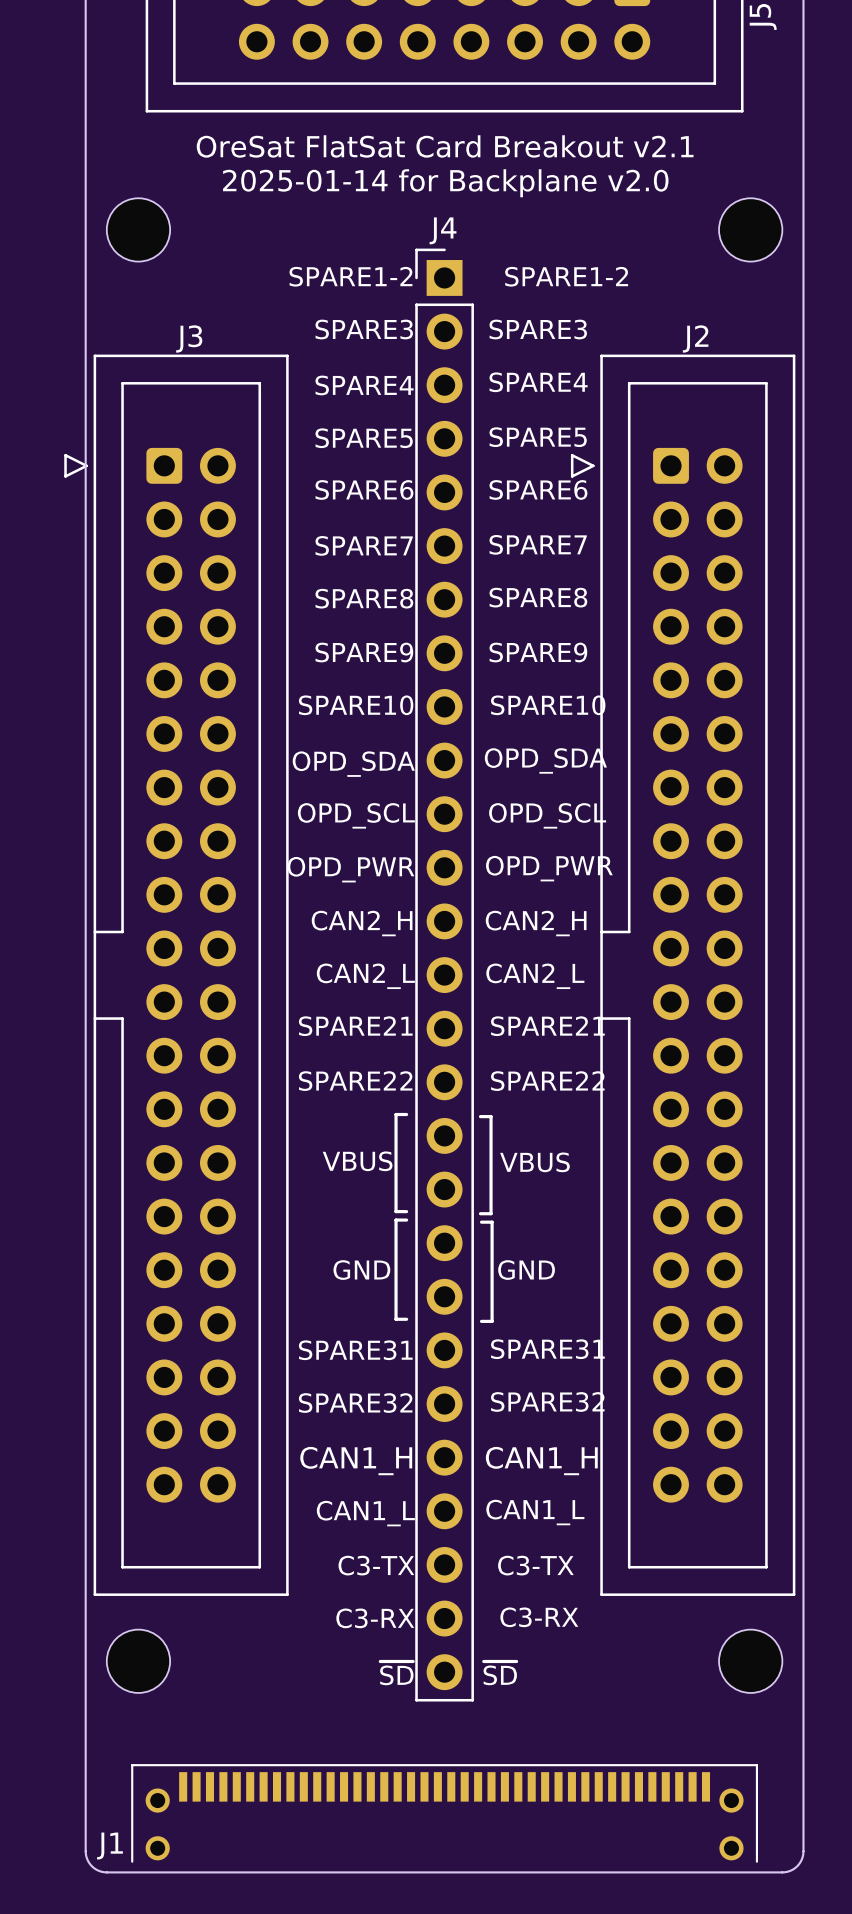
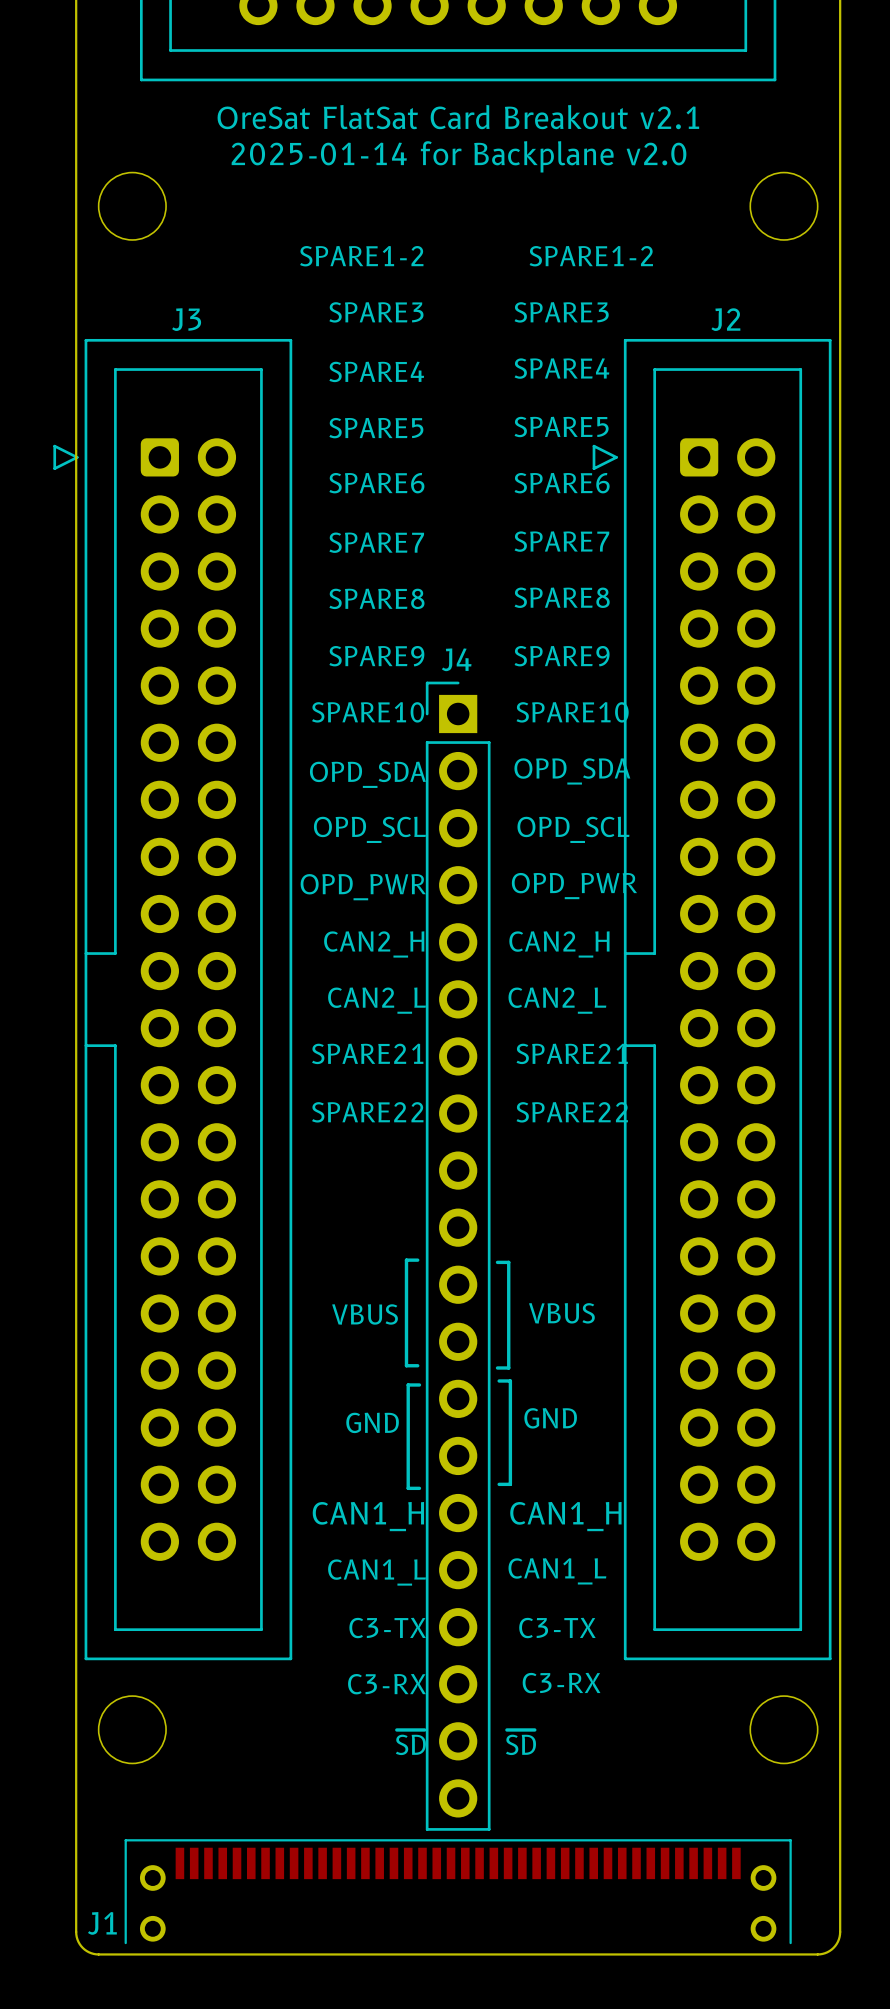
J4 name position: J4 (443, 230) -> J4 (456, 659)
J4 footprint: [415, 248, 474, 1702] -> [425, 681, 491, 1831]
line: (406, 1114) (396, 1114) (396, 1211) (406, 1211) -> (419, 1384) (408, 1384) (408, 1488) (419, 1488)
line: (480, 1116) (491, 1116) (491, 1213) (480, 1213) -> (499, 1380) (510, 1380) (510, 1484) (499, 1484)
text: VBUS (357, 1161) -> none
text: VBUS (534, 1162) -> none
text: GND (361, 1270) -> VBUS (365, 1314)
text: GND (526, 1270) -> VBUS (561, 1313)
text: SPARE31 (547, 1349) -> none
text: SPARE31 (355, 1350) -> none
text: none -> GND (550, 1418)
text: none -> GND (372, 1422)
text: SPARE32 (547, 1401) -> none
text: SPARE32 (355, 1403) -> none

